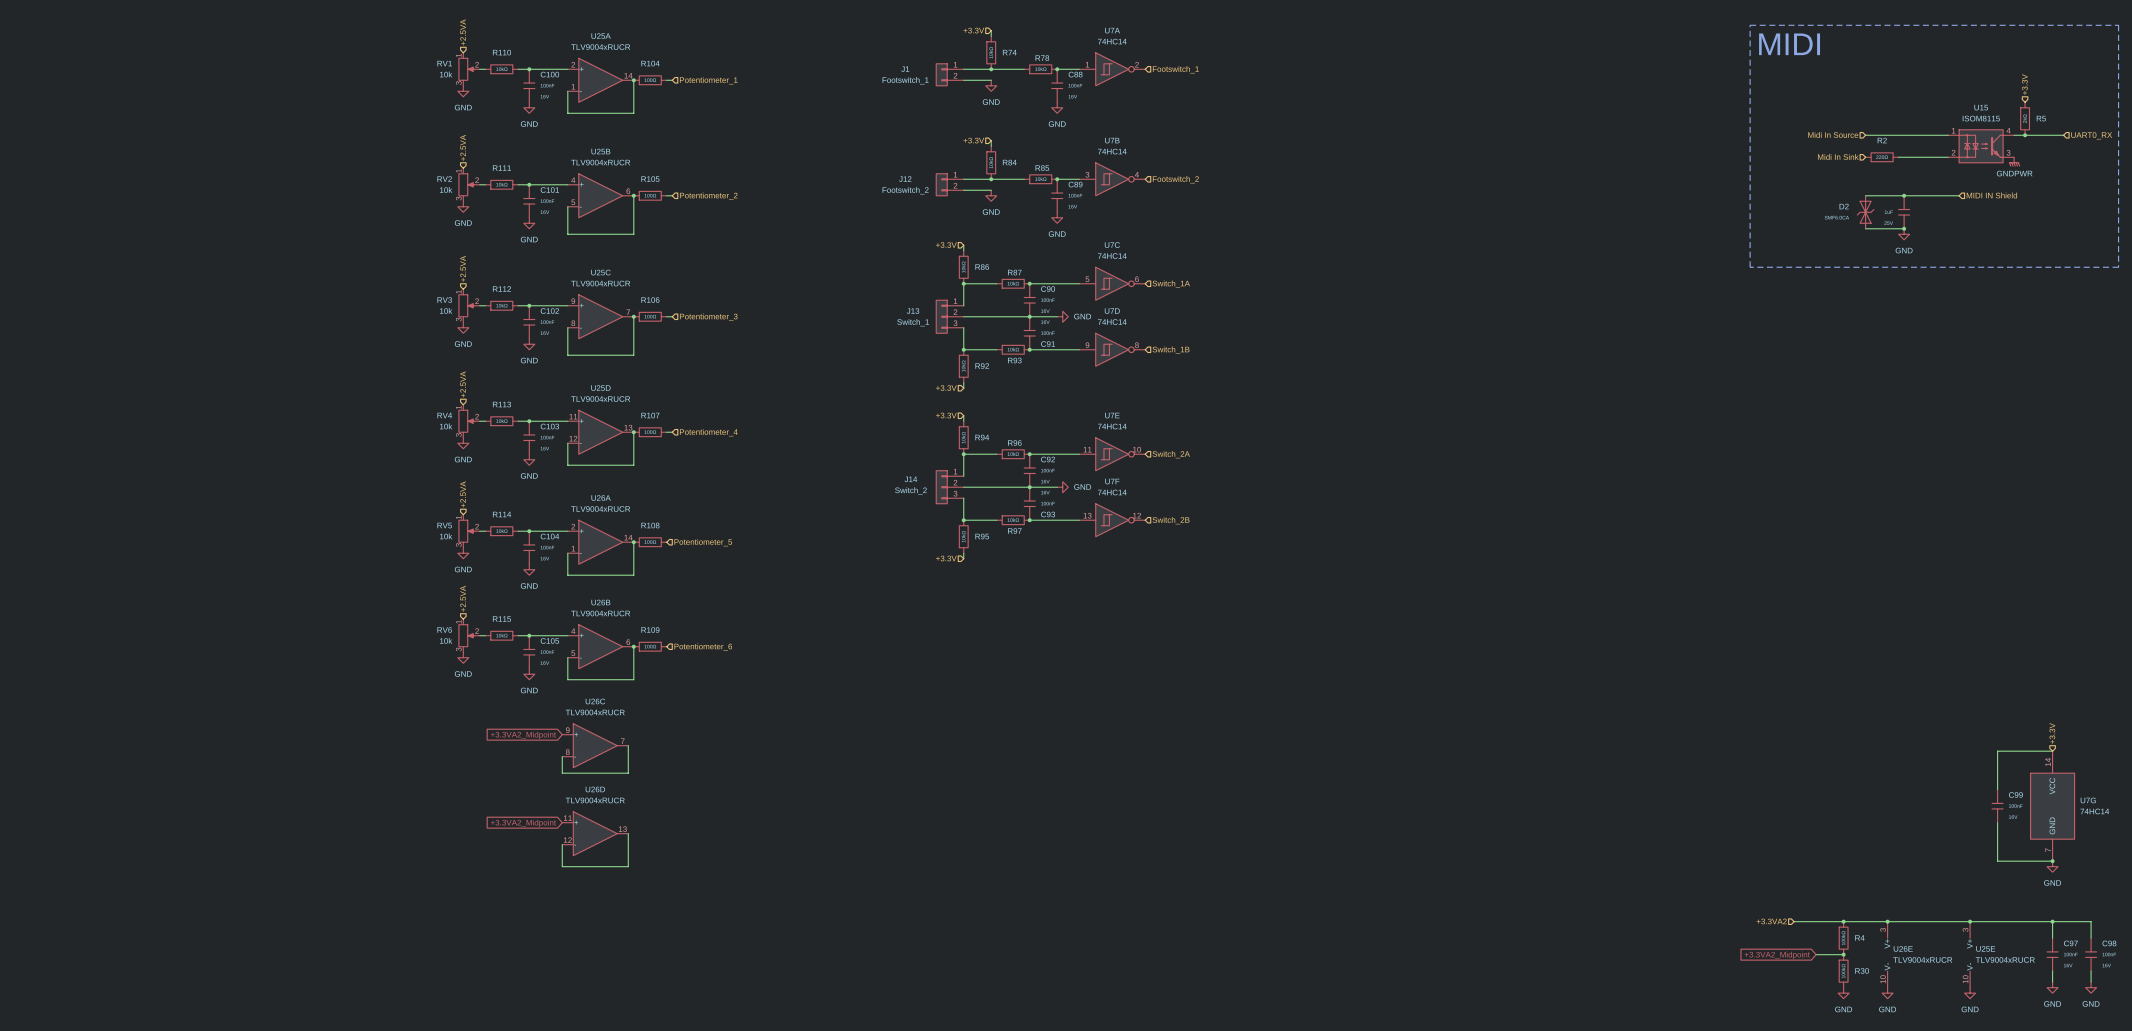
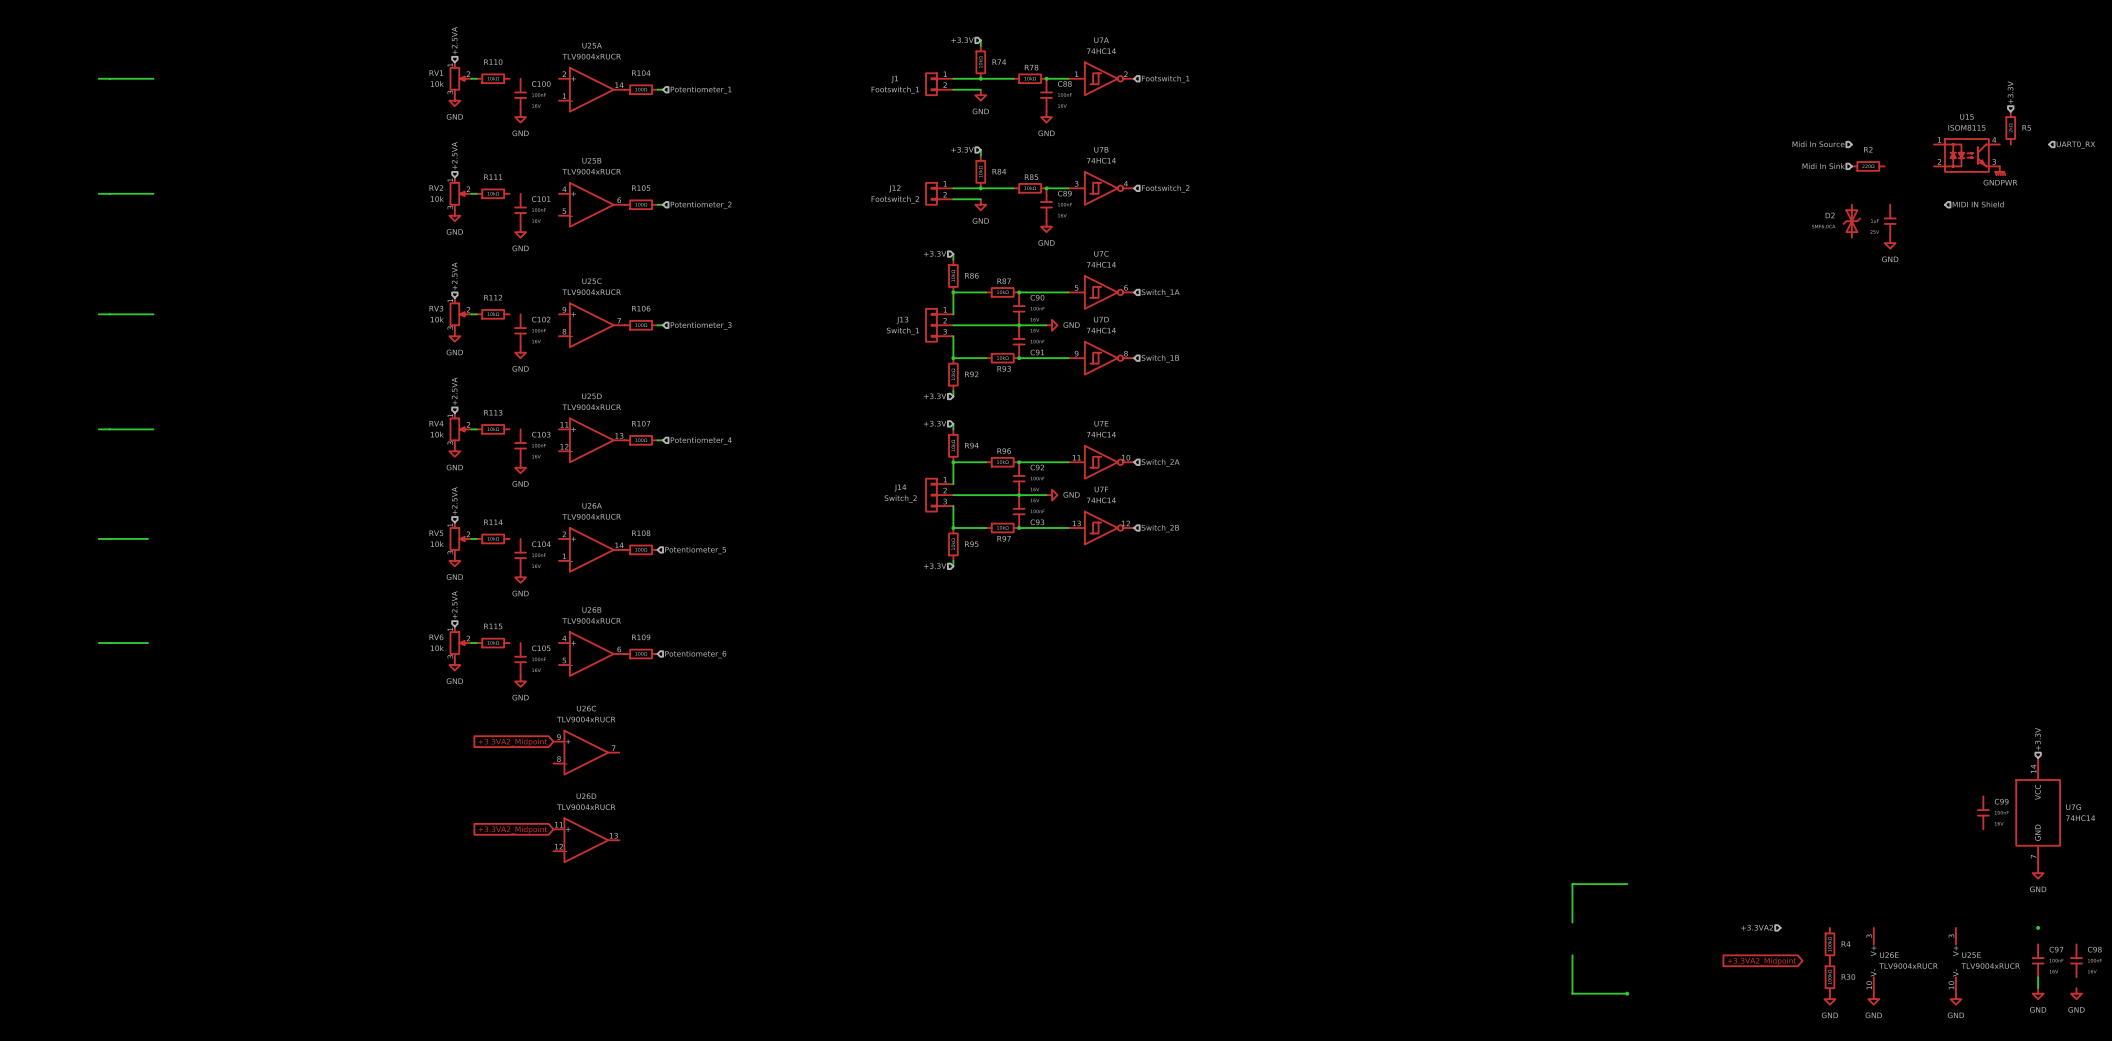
line: (1750, 25) (2118, 25) (2118, 267) (1750, 267) (1750, 25) -> none
text: MIDI (1789, 44) -> none
wire: none -> (98, 78) (153, 78)
wire: (518, 69) (567, 69) -> none
junction: (529, 69) -> none
wire: (633, 80) (633, 113) (567, 113) (567, 91) -> none
junction: (633, 80) -> none
wire: (1865, 135) (1948, 135) -> none
wire: (2014, 135) (2063, 135) -> none
junction: (2025, 135) -> none
wire: (1898, 157) (1948, 157) -> none
wire: none -> (98, 193) (153, 193)
wire: (518, 184) (567, 184) -> none
junction: (529, 184) -> none
wire: (633, 195) (633, 234) (567, 234) (567, 206) -> none
junction: (633, 195) -> none
wire: (1865, 195) (1959, 195) -> none
junction: (1904, 195) -> none
wire: (1865, 228) (1904, 228) -> none
junction: (1904, 228) -> none
wire: none -> (98, 314) (153, 314)
wire: (518, 305) (567, 305) -> none
junction: (529, 305) -> none
wire: (633, 316) (633, 355) (567, 355) (567, 327) -> none
junction: (633, 316) -> none
wire: none -> (98, 429) (153, 429)
wire: (518, 421) (567, 421) -> none
junction: (529, 421) -> none
wire: (633, 432) (633, 465) (567, 465) (567, 443) -> none
junction: (633, 432) -> none
wire: none -> (98, 538) (148, 538)
wire: (518, 531) (567, 531) -> none
junction: (529, 531) -> none
wire: (633, 542) (633, 575) (567, 575) (567, 553) -> none
junction: (633, 542) -> none
wire: none -> (98, 643) (148, 643)
wire: (518, 635) (567, 635) -> none
junction: (529, 635) -> none
wire: (633, 646) (633, 679) (567, 679) (567, 657) -> none
junction: (633, 646) -> none
wire: (628, 745) (628, 773) (562, 773) (562, 756) -> none
wire: (2052, 751) (1997, 751) (1997, 789) -> none
wire: (1997, 822) (1997, 861) (2052, 861) -> none
wire: (628, 833) (628, 866) (562, 866) (562, 844) -> none
junction: (2052, 861) -> none
wire: none -> (1627, 884) (1572, 884) (1572, 922)
wire: (1794, 921) (2091, 921) (2091, 938) -> none
junction: (1843, 921) -> none
junction: (1887, 921) -> none
junction: (1970, 921) -> none
wire: (2052, 921) (2052, 938) -> none
wire: none -> (1572, 955) (1572, 993) (1627, 993)
wire: (1816, 954) (1843, 954) -> none
junction: (1843, 954) -> none
wire: (2091, 971) (2091, 982) -> none
junction: none -> (1627, 993)

